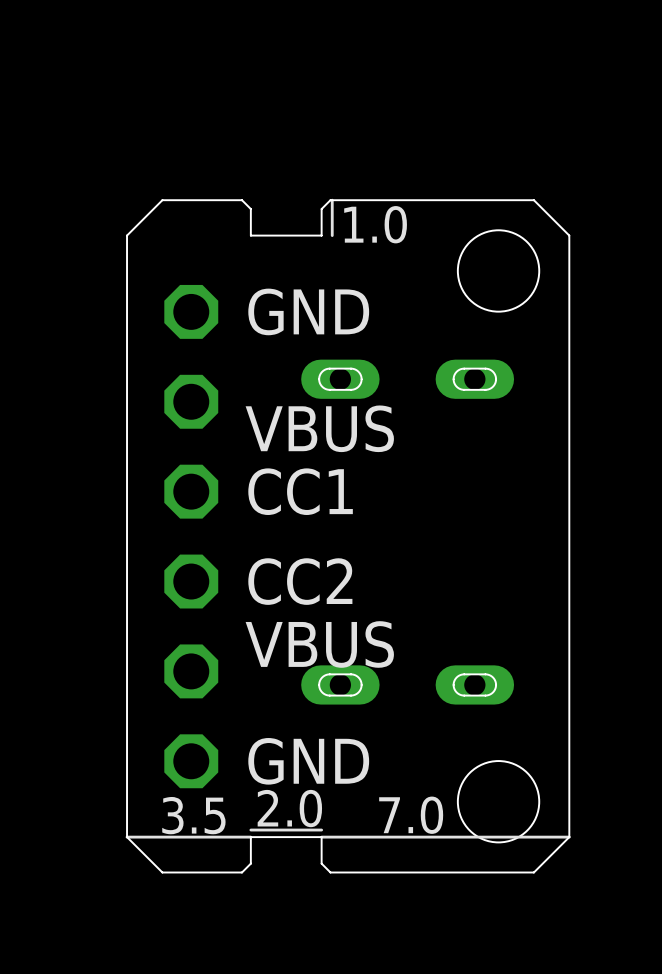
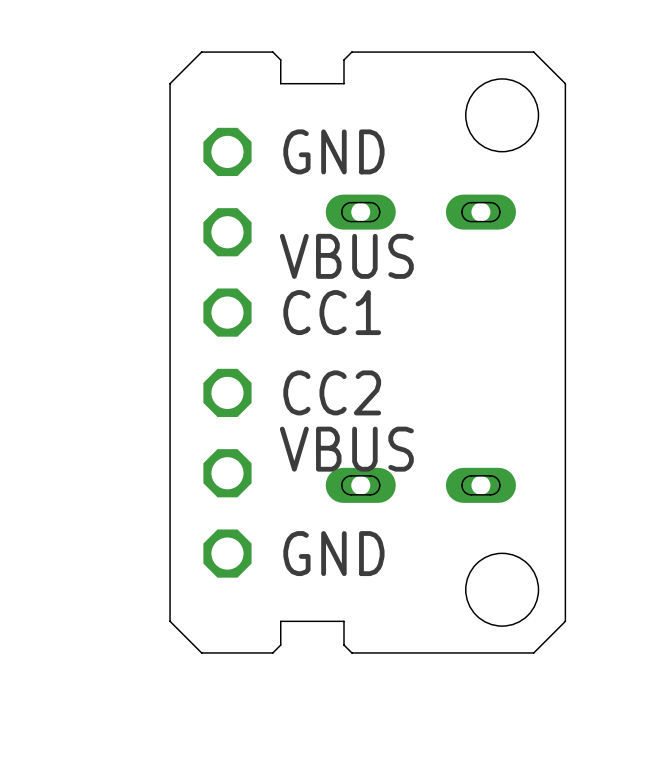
line: (332, 200) (332, 235) -> none
text: 1.0 (375, 224) -> none
text: 2.0 (289, 808) -> none
text: 3.5 (193, 815) -> none
text: 7.0 (411, 815) -> none
line: (321, 830) (250, 830) -> none
line: (250, 837) (127, 837) -> none
line: (569, 837) (321, 837) -> none

